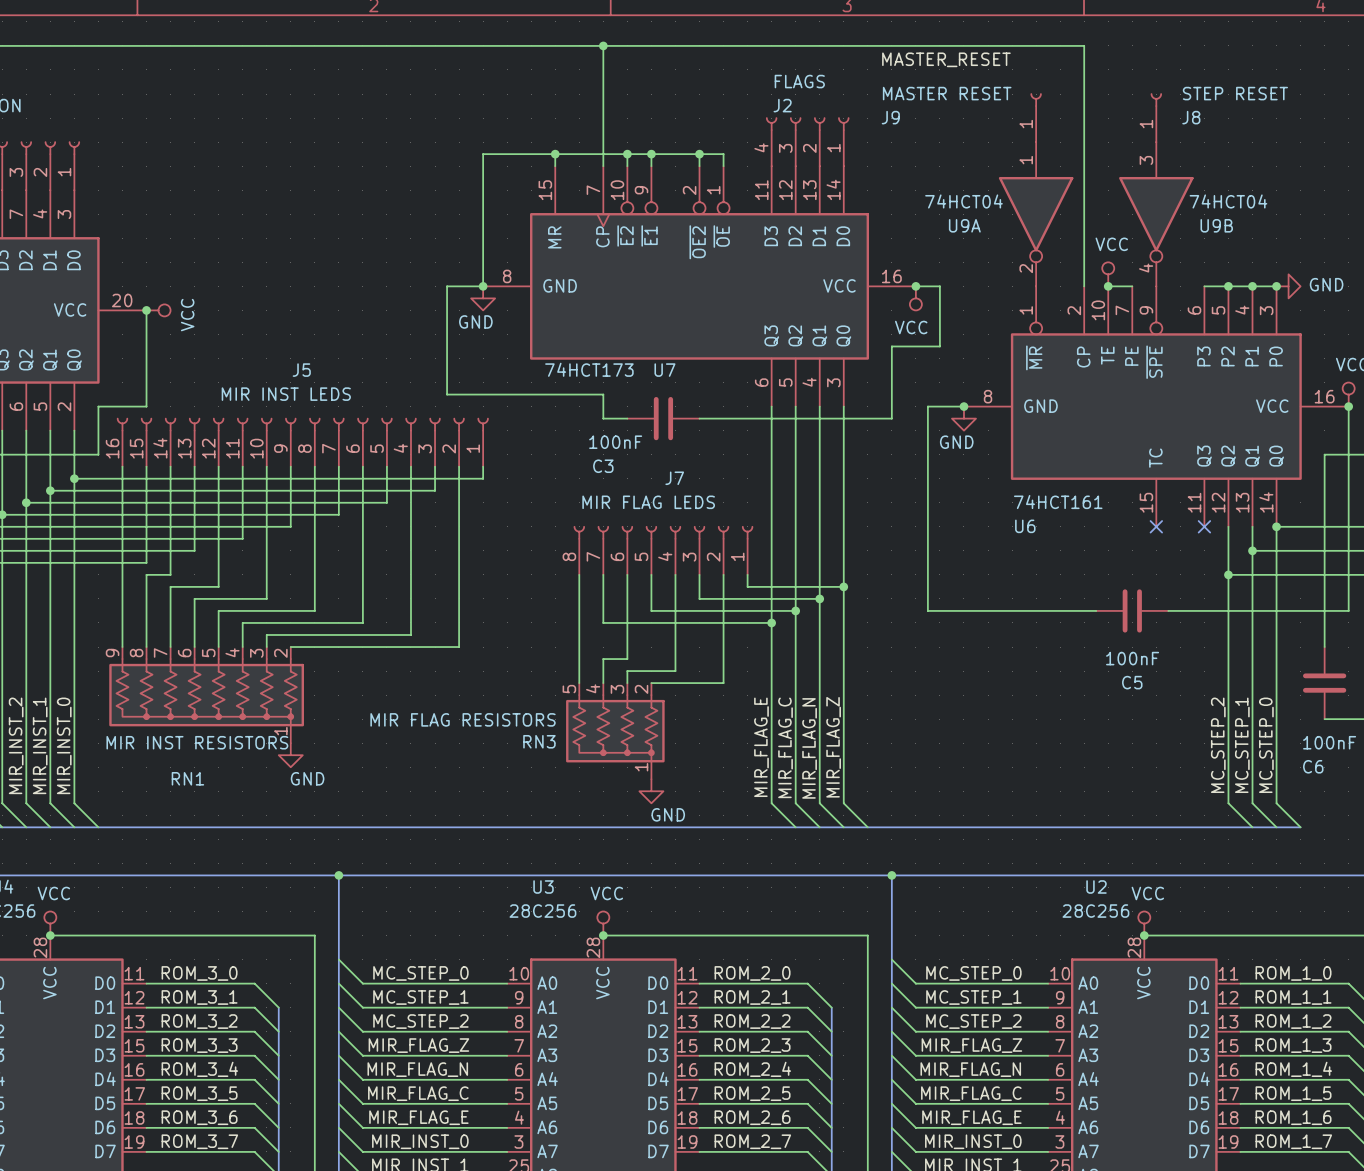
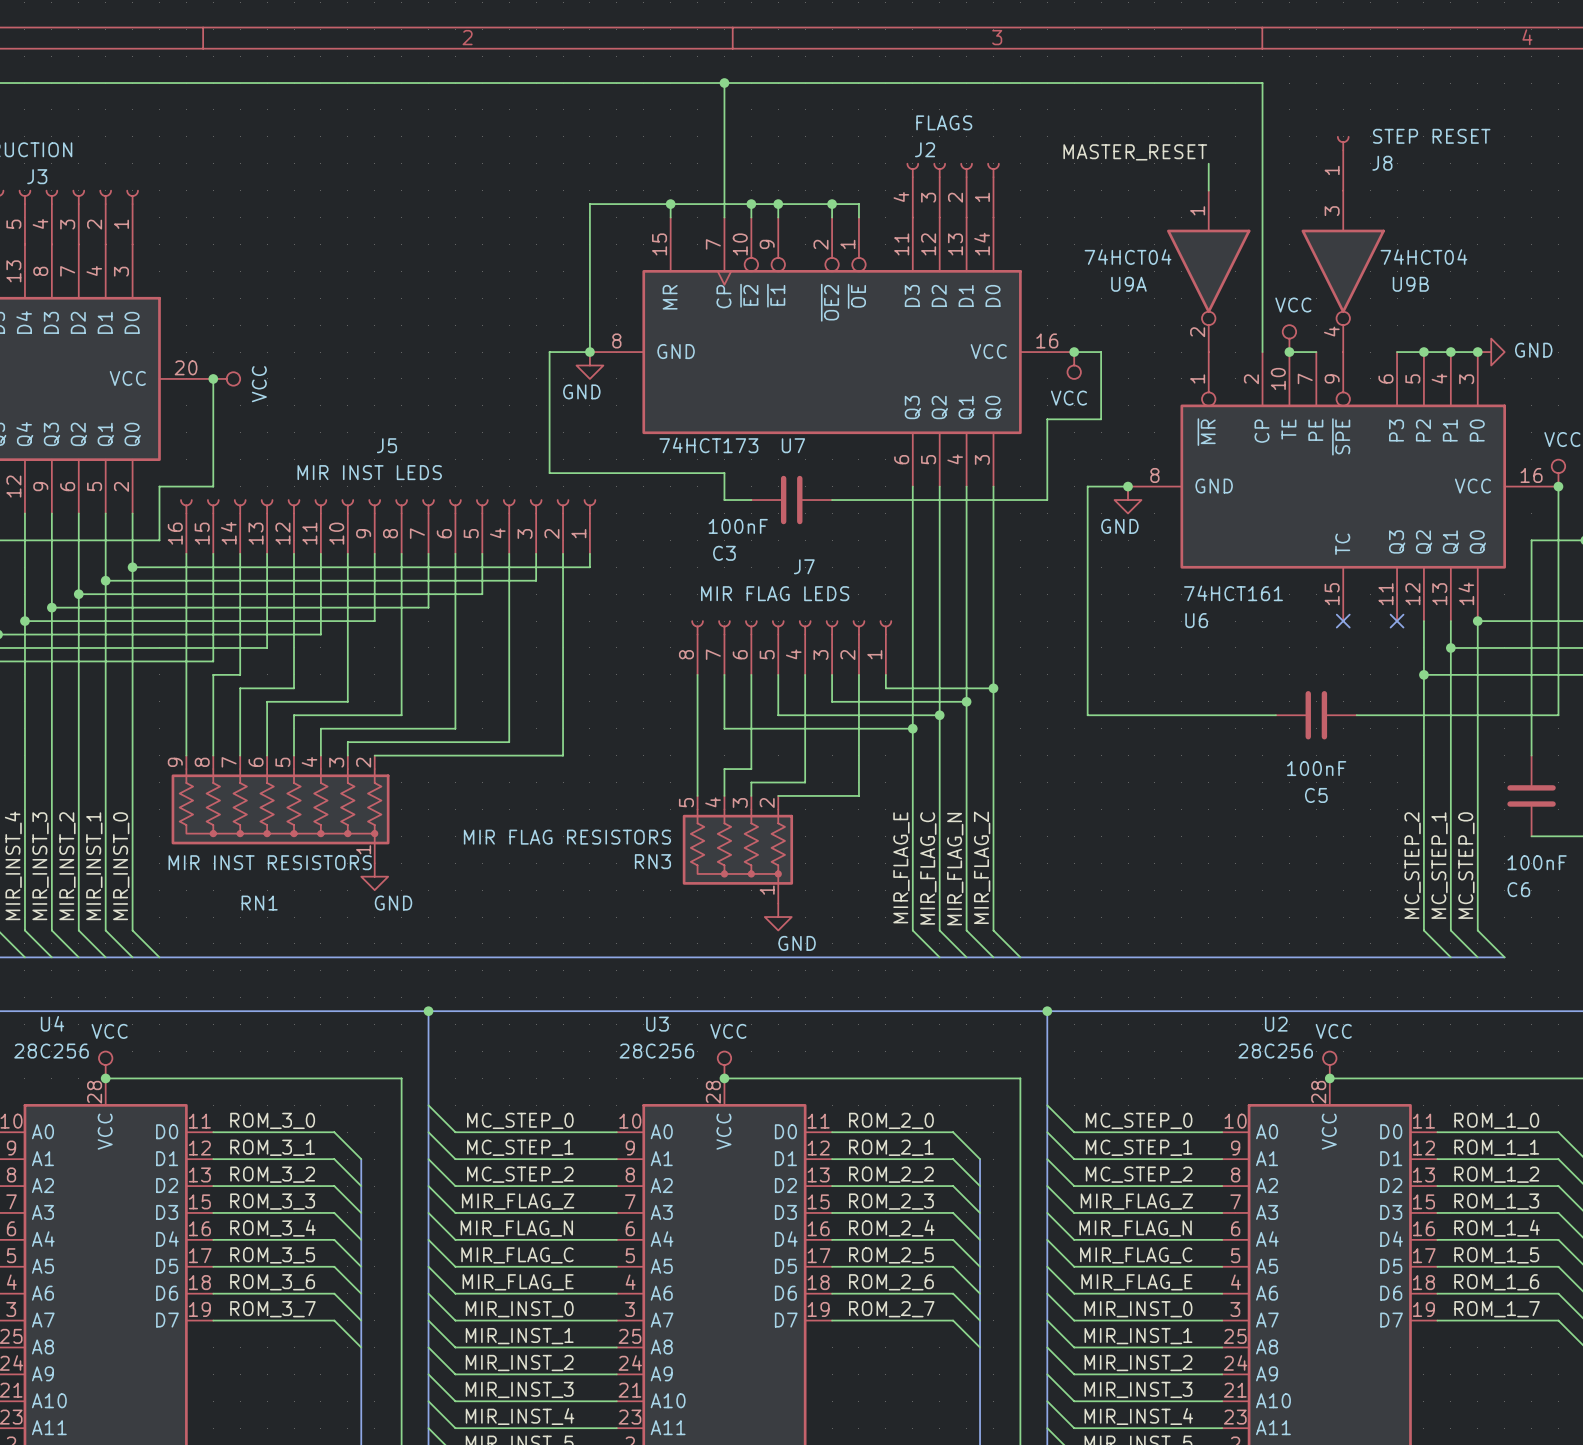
label position: MASTER_RESET (946, 59) -> MASTER_RESET (1135, 152)
J9: MASTER RESET (1036, 117) -> none

